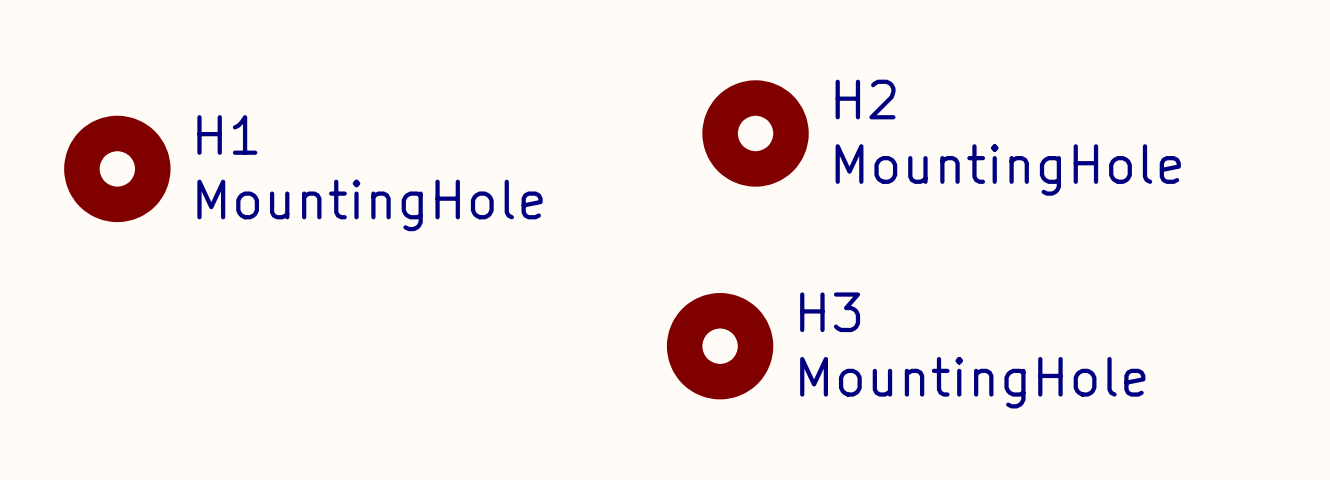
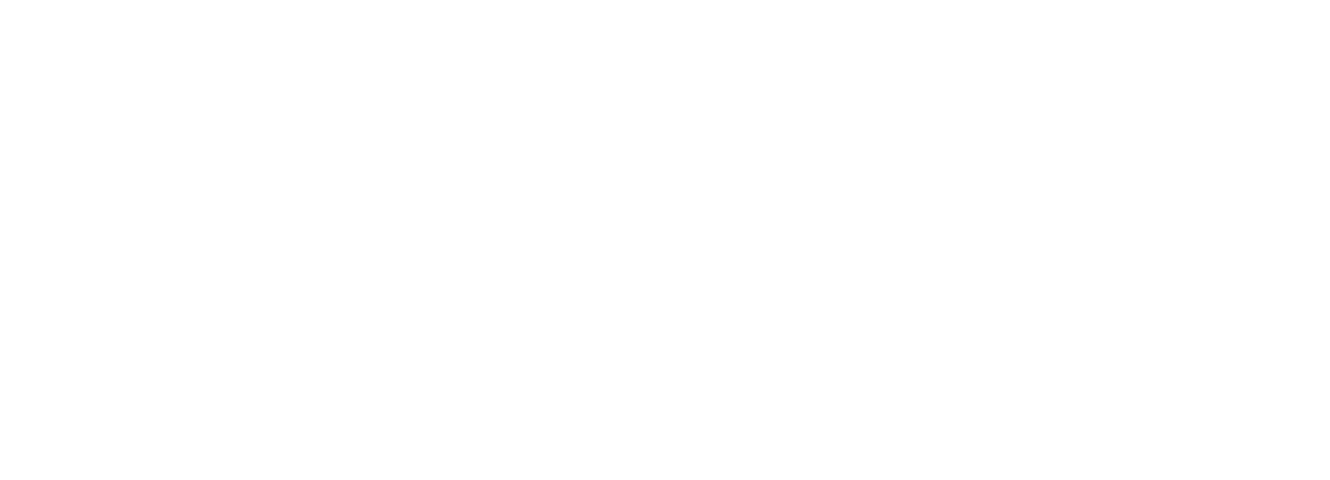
H2: MountingHole (755, 133) -> none
H1: MountingHole (117, 168) -> none
H3: MountingHole (720, 346) -> none

